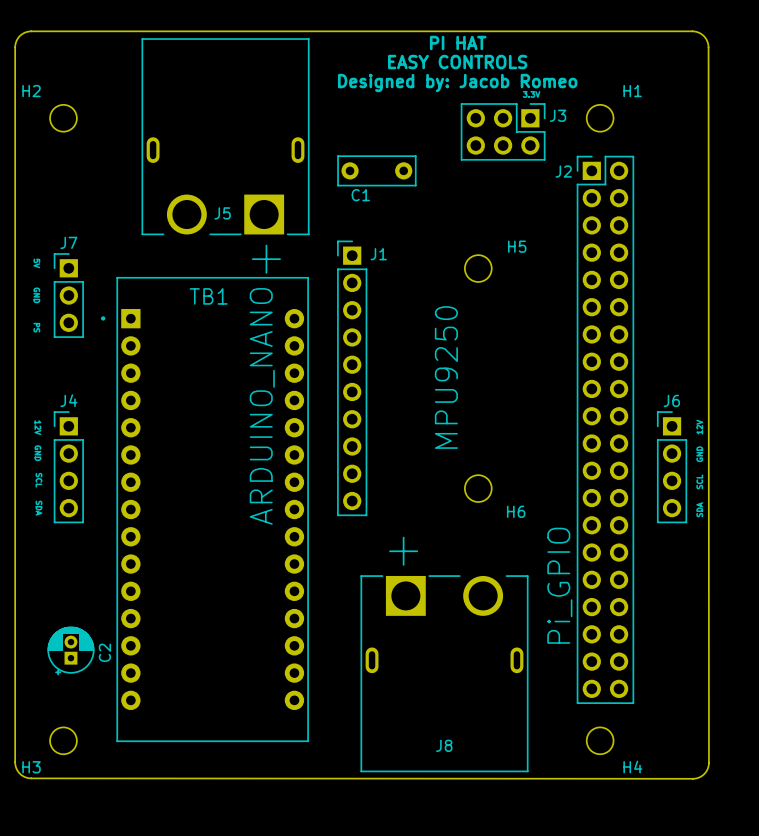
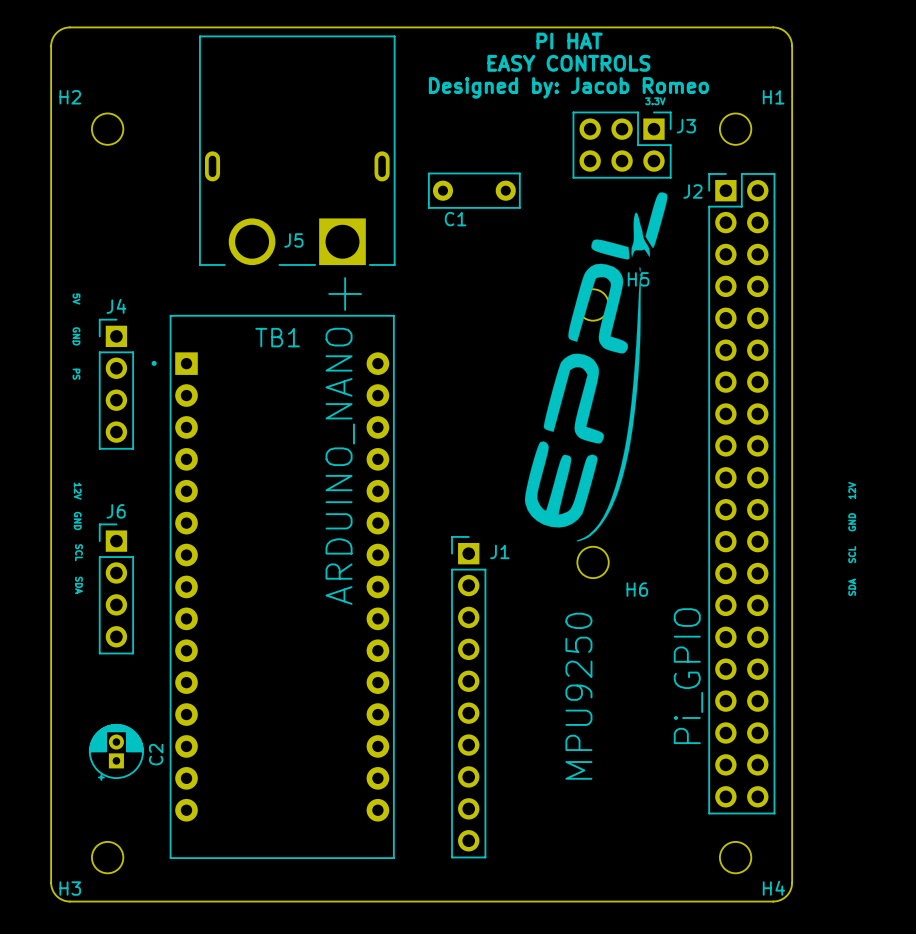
board edge: (632, 31) (694, 31) (703, 36) (708, 45) (708, 762) (705, 772) (699, 777) (692, 778) (31, 778) -> (773, 27) (786, 32) (792, 46) (792, 882) (788, 894) (780, 900) (773, 901) (69, 901)
drawing: none -> [524, 192, 668, 542]
J7: (68, 295) -> none
text position: MPU9250 (446, 377) -> MPU9250 (578, 696)
J1 position: (352, 378) -> (468, 697)
J4 position: (68, 467) -> (116, 384)
J6 position: (672, 467) -> (116, 588)
J8: (444, 654) -> none

